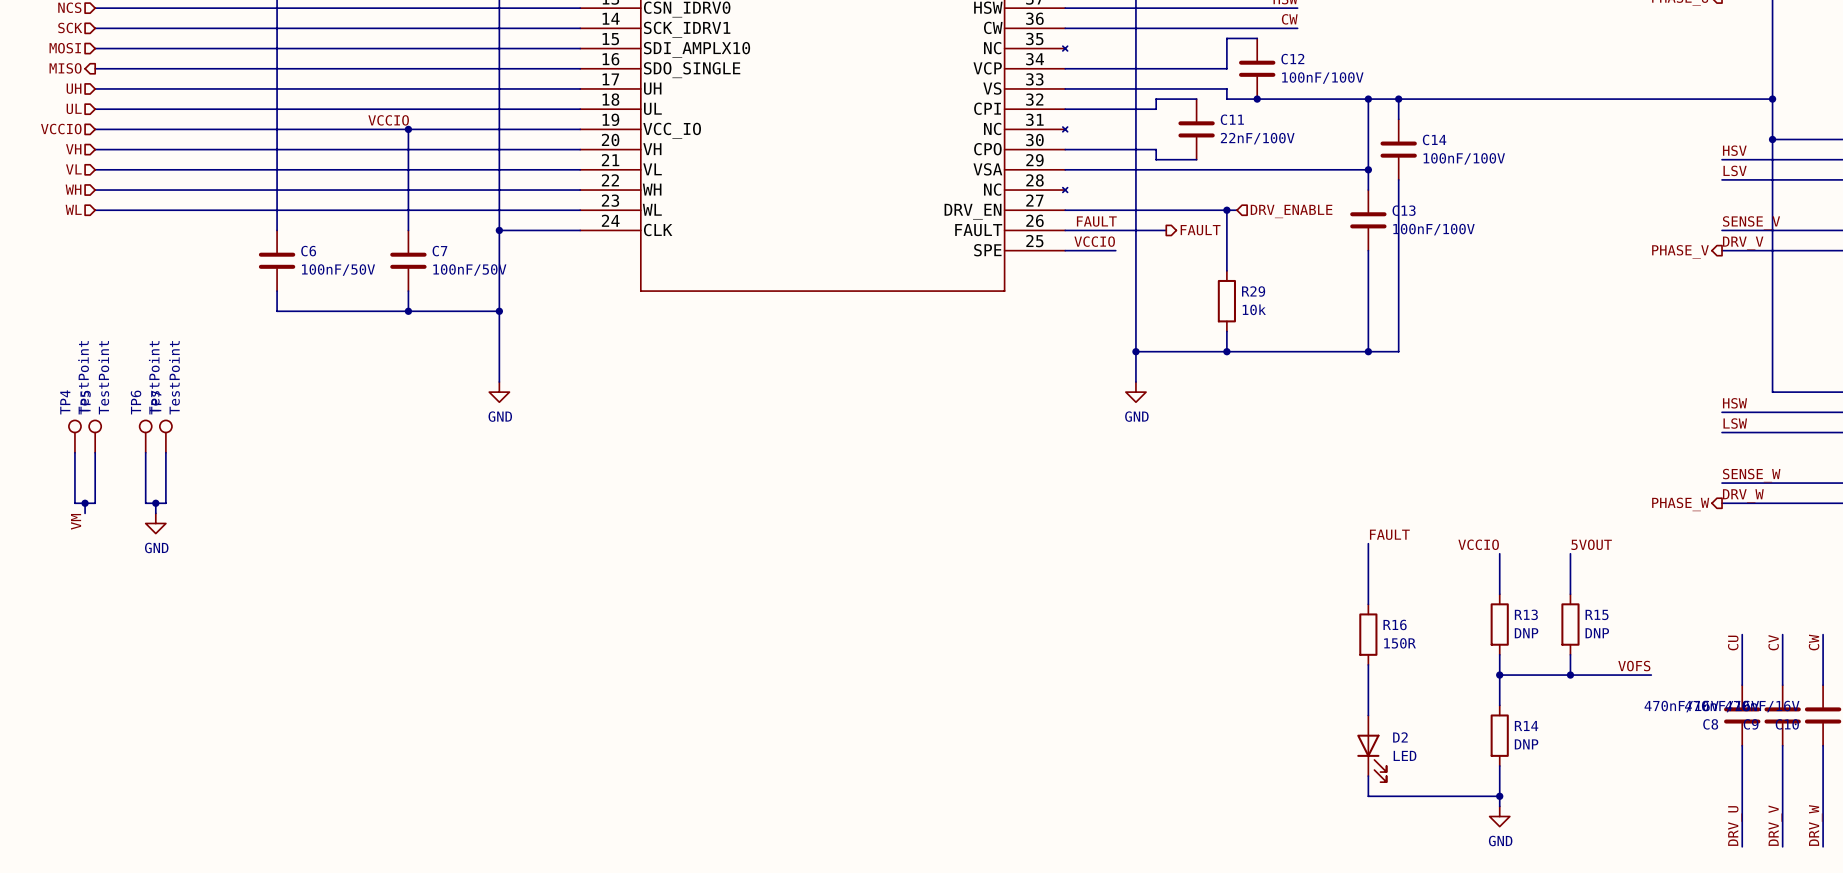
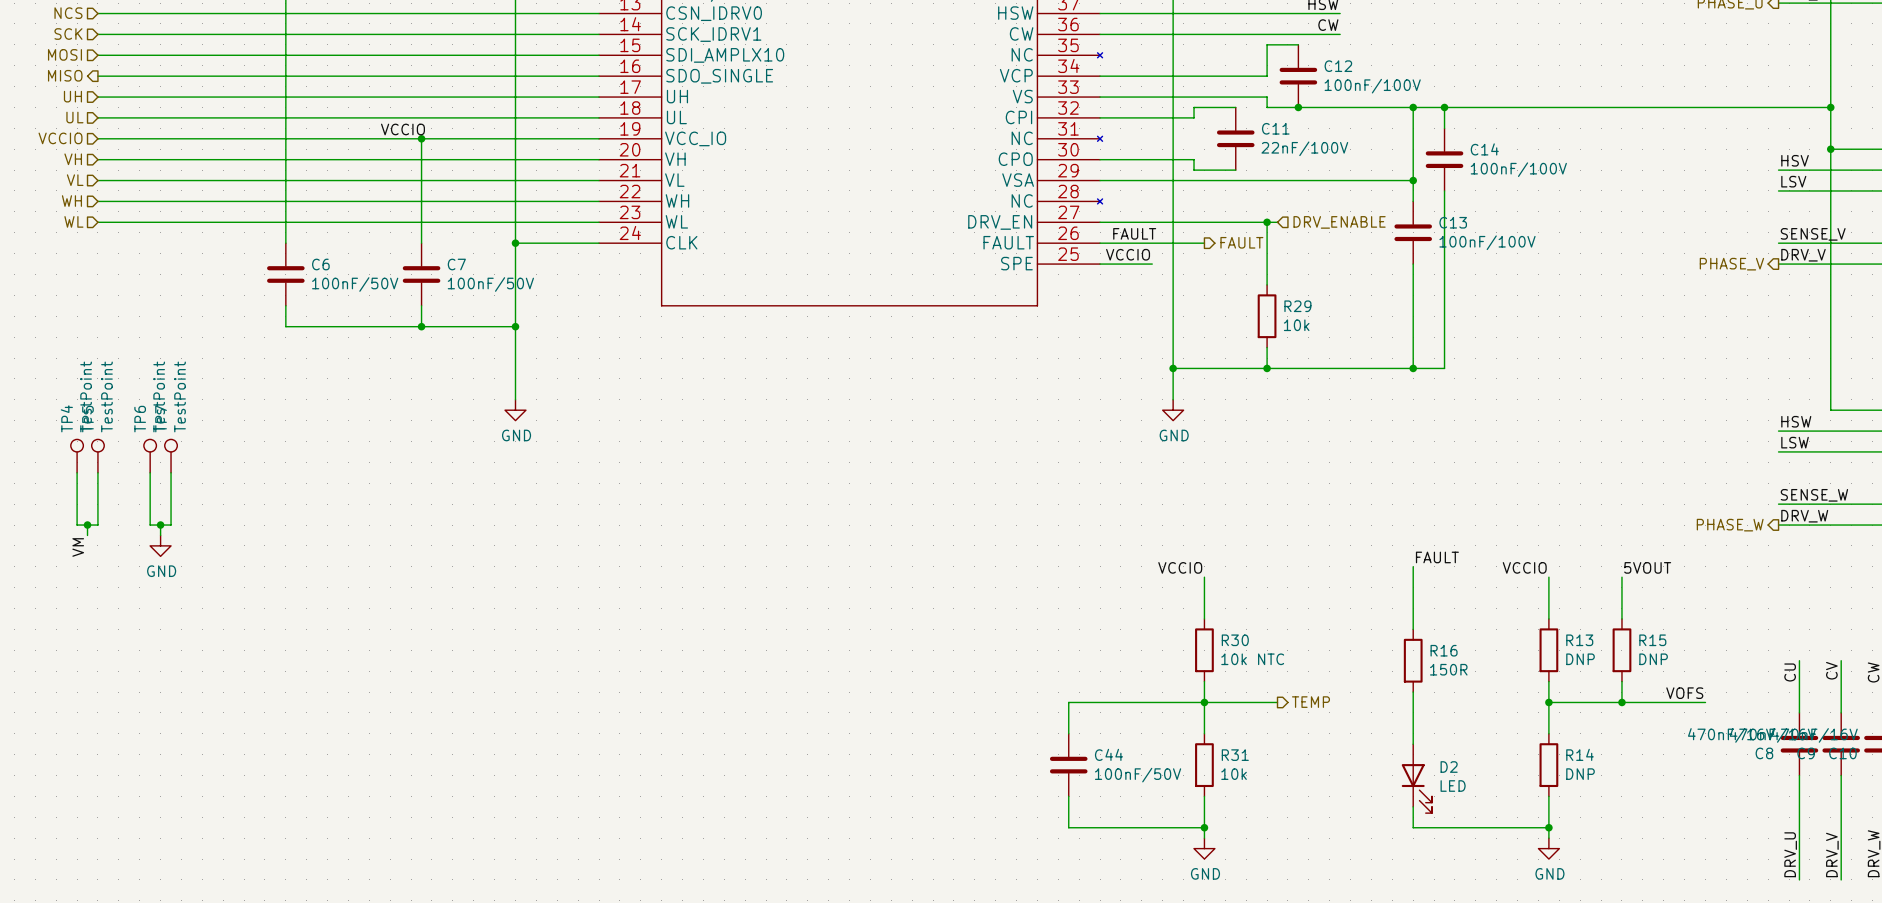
label: none -> VCCIO (1180, 567)
wire: none -> (1204, 577) (1204, 618)
R30: none -> 10k NTC (1204, 650)
wire: none -> (1204, 681) (1204, 733)
hierarchical label: none -> TEMP (1310, 702)
junction: none -> (1204, 702)
wire: none -> (1277, 702) (1068, 702) (1068, 733)
C44: none -> 100nF/50V (1068, 765)
R31: none -> 10k (1204, 765)
wire: none -> (1068, 796) (1068, 827) (1204, 827)
wire: none -> (1204, 796) (1204, 838)
junction: none -> (1204, 827)
power symbol: none -> GND (1204, 848)

